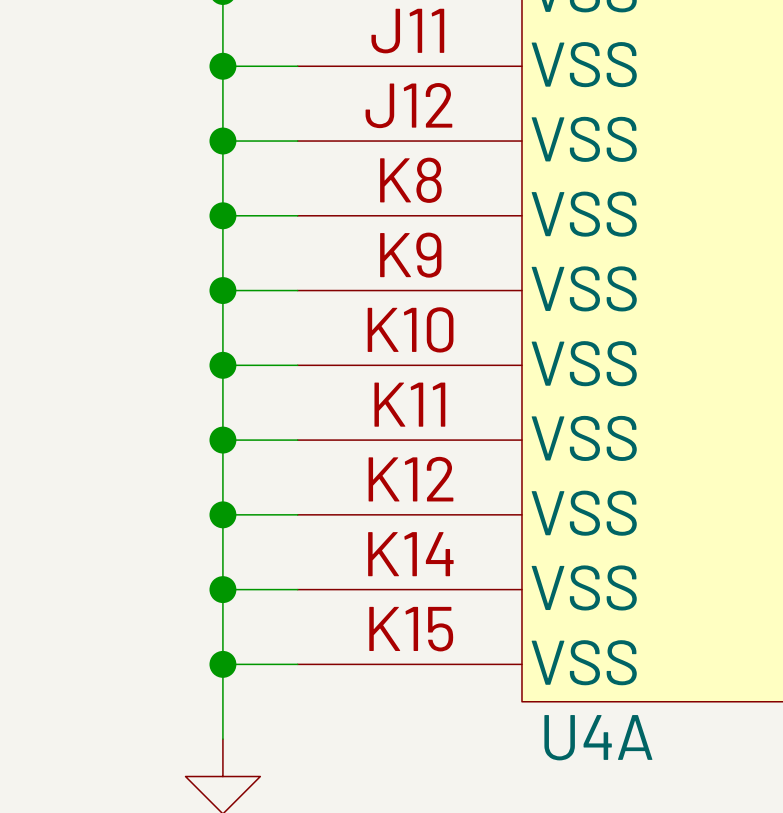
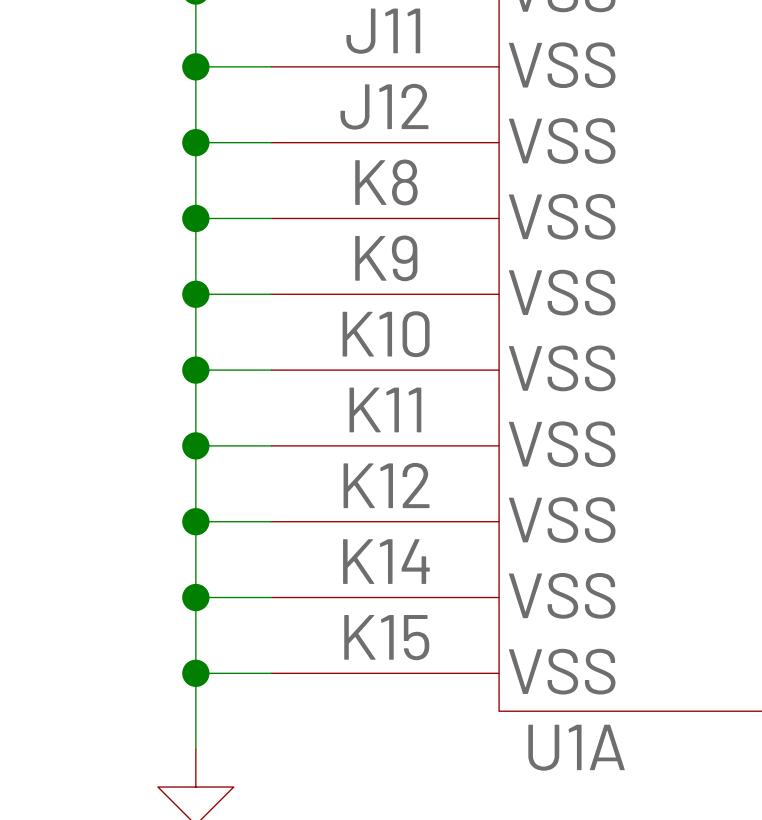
U4A name: U4A (598, 737) -> U1A (576, 747)

